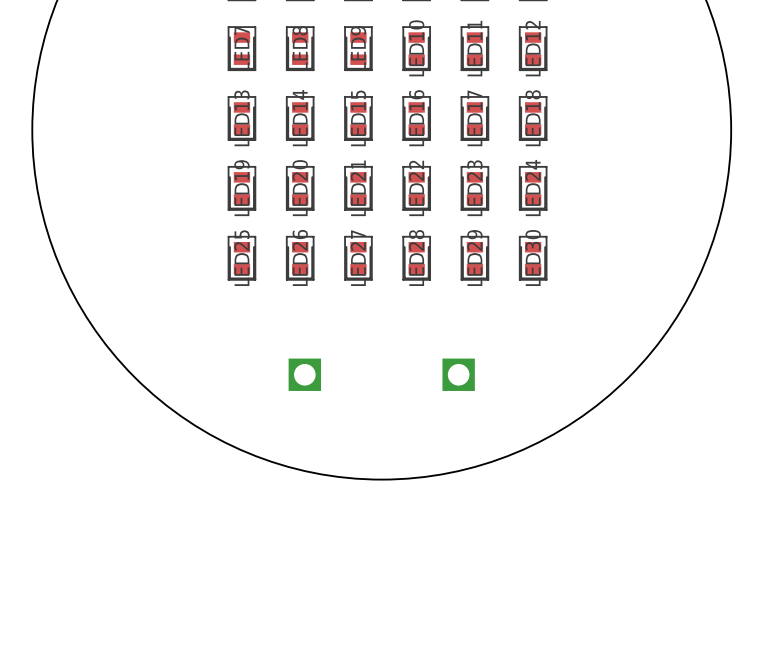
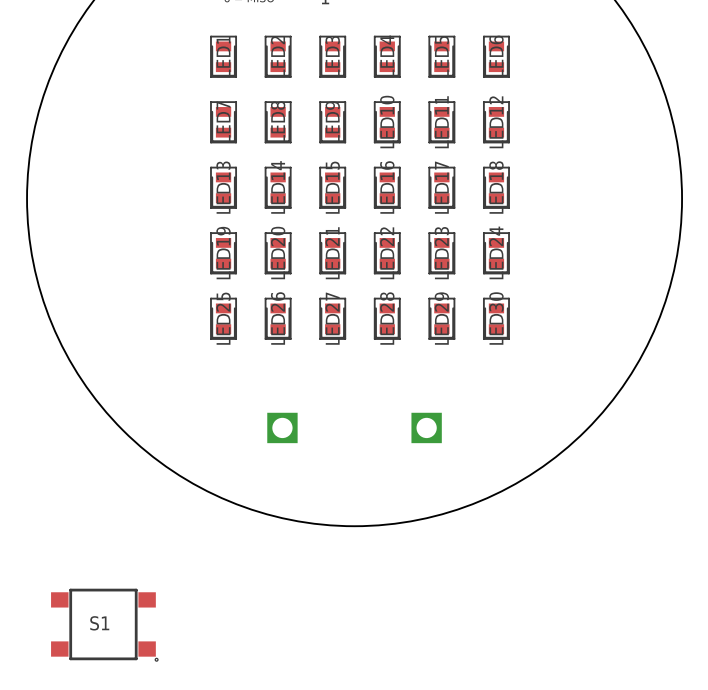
S1: none -> (104, 625)

